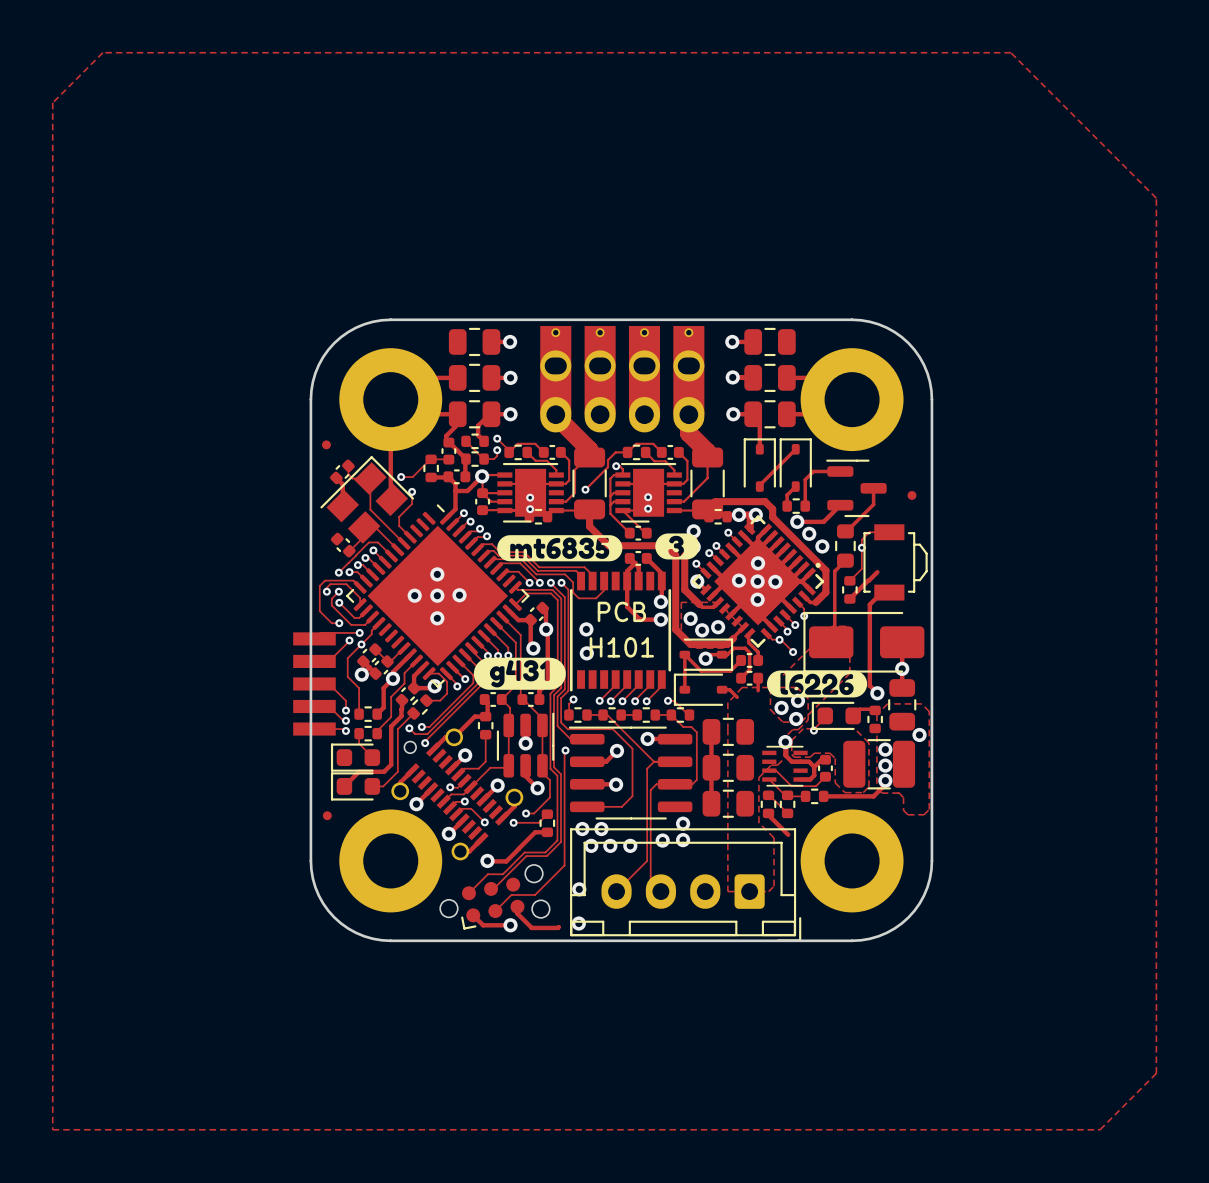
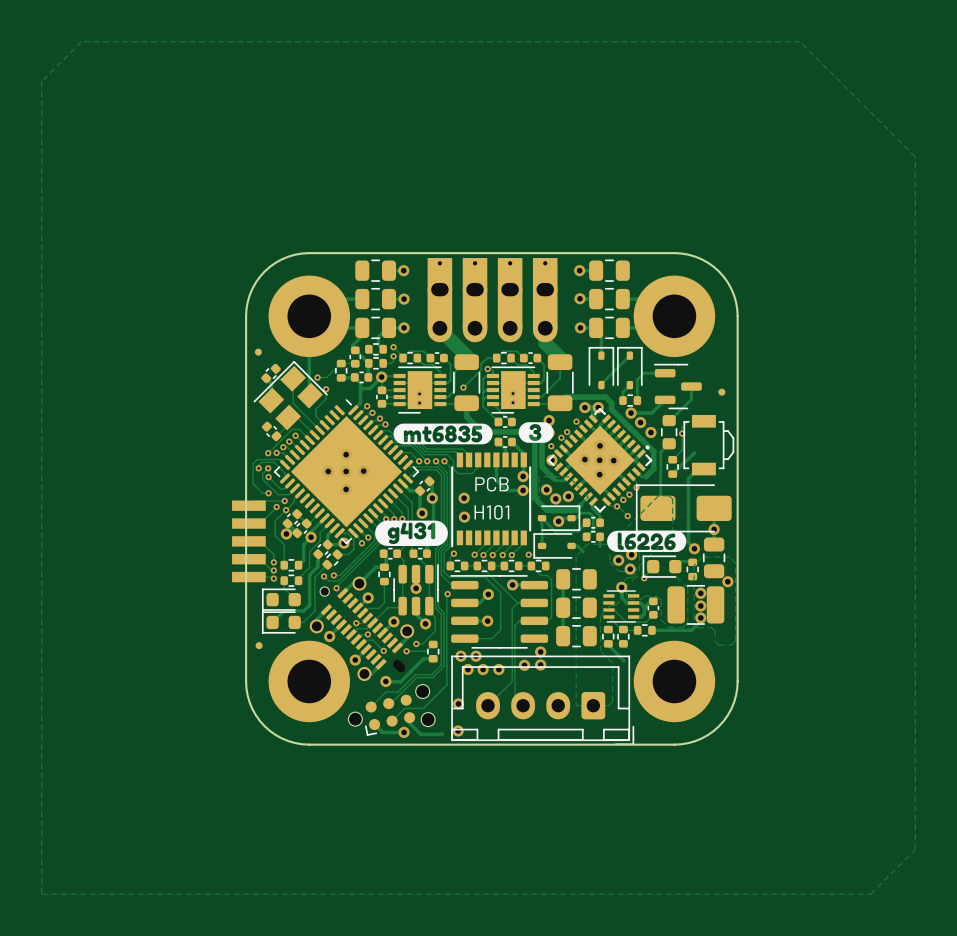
part: (538, 516) -> none
part: (718, 516) -> none
track: (635, 562) (627, 571) (627, 581) -> none

